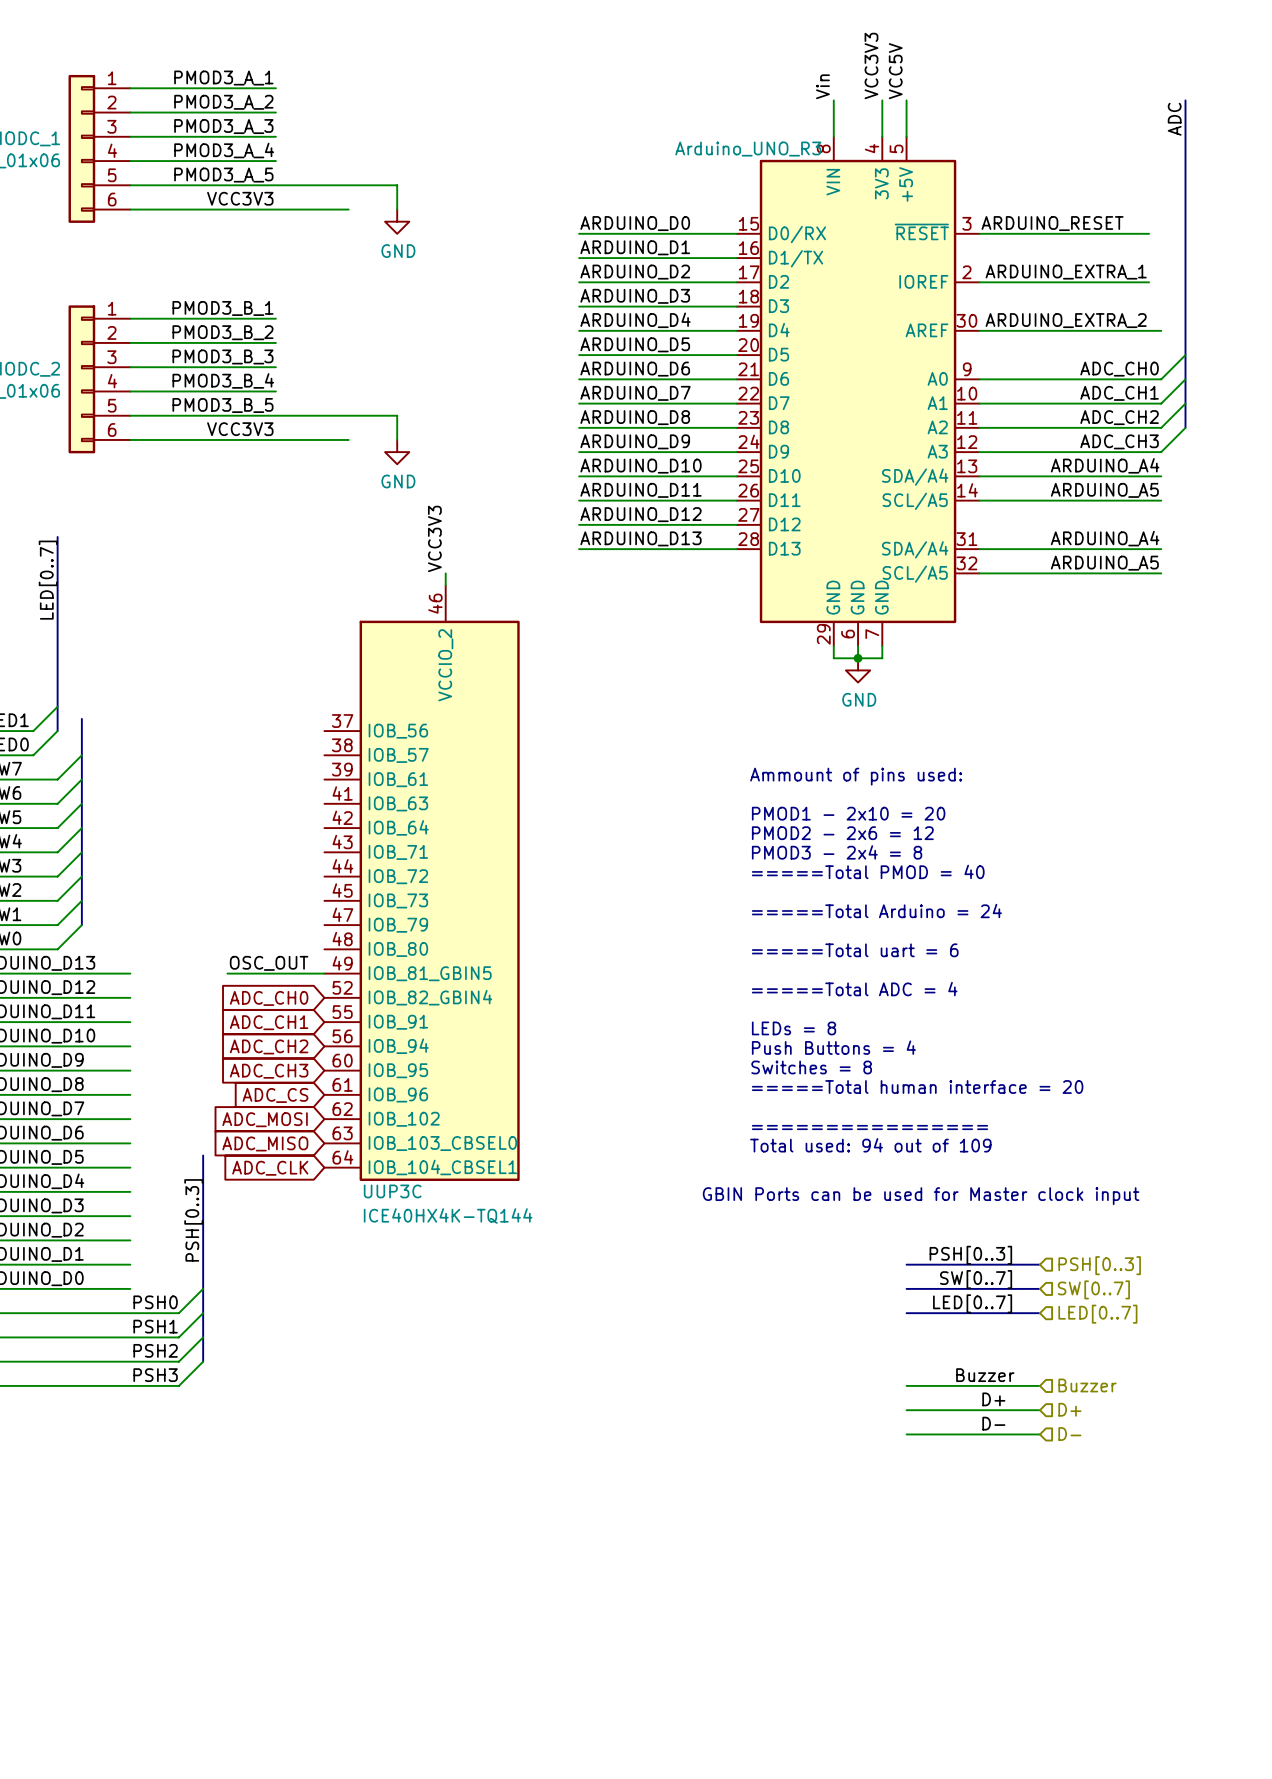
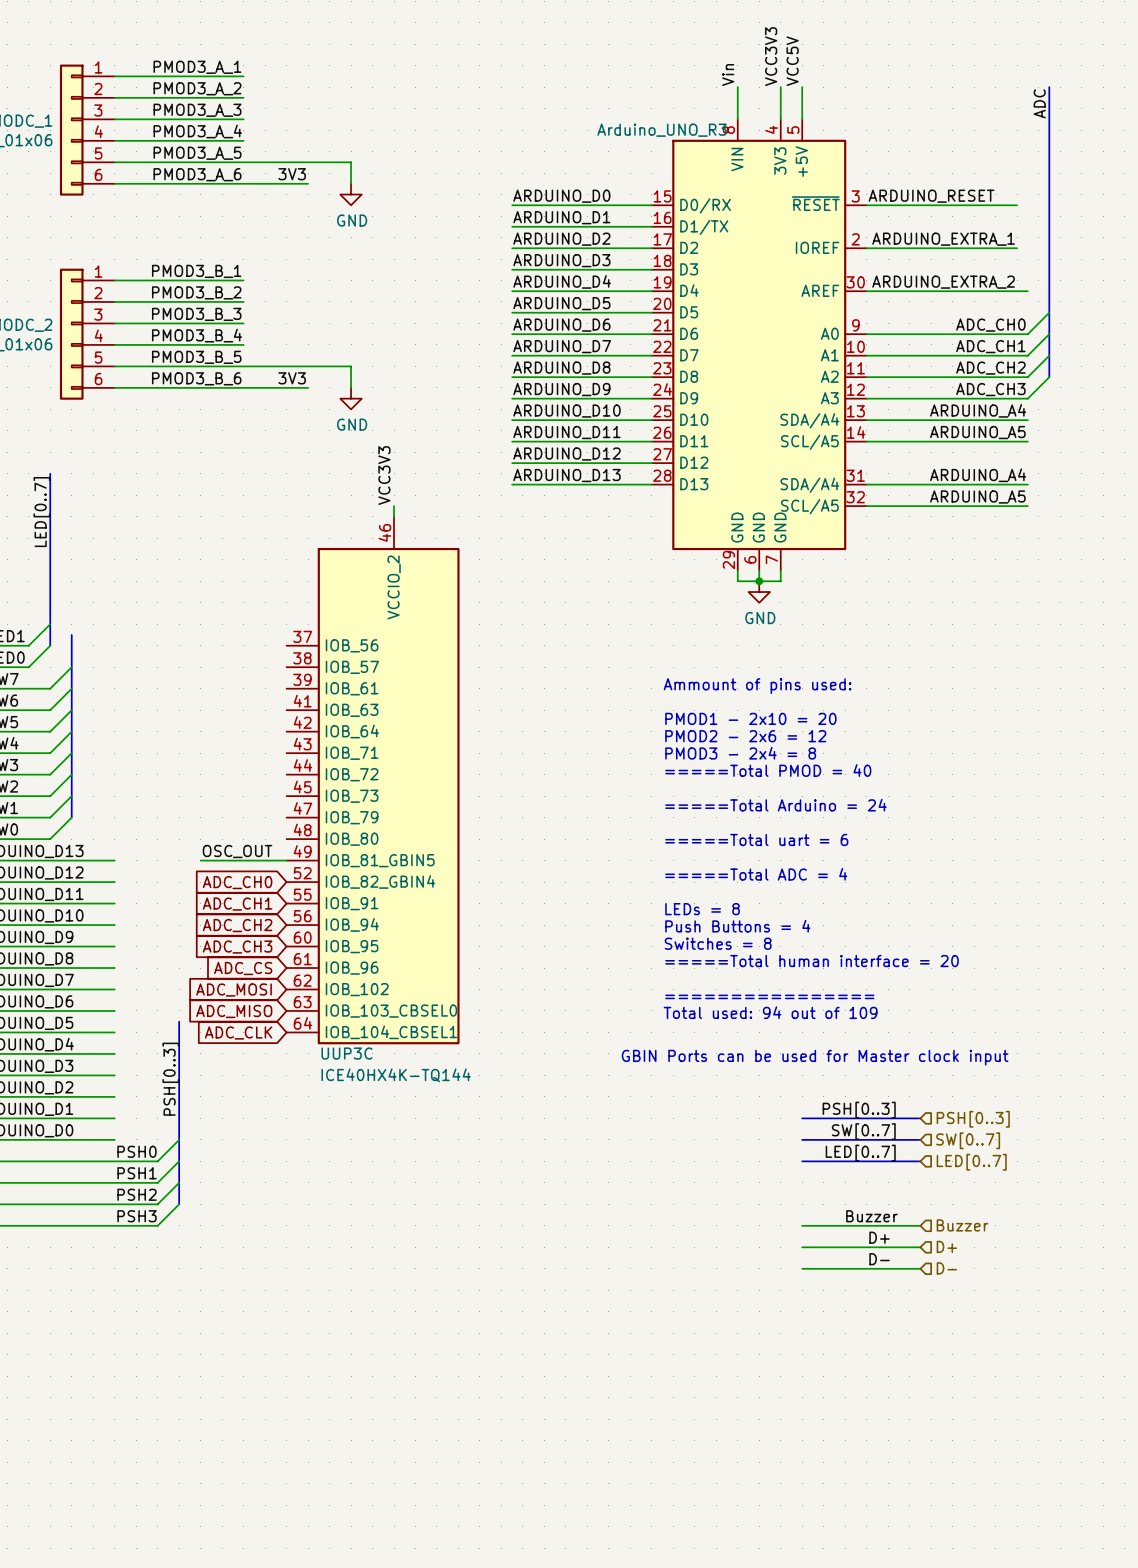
label: VCC3V3 (240, 198) -> PMOD3_A_6 (197, 174)
label: none -> 3V3 (292, 174)
label: VCC3V3 (240, 429) -> PMOD3_B_6 (196, 378)
label: none -> 3V3 (292, 378)

